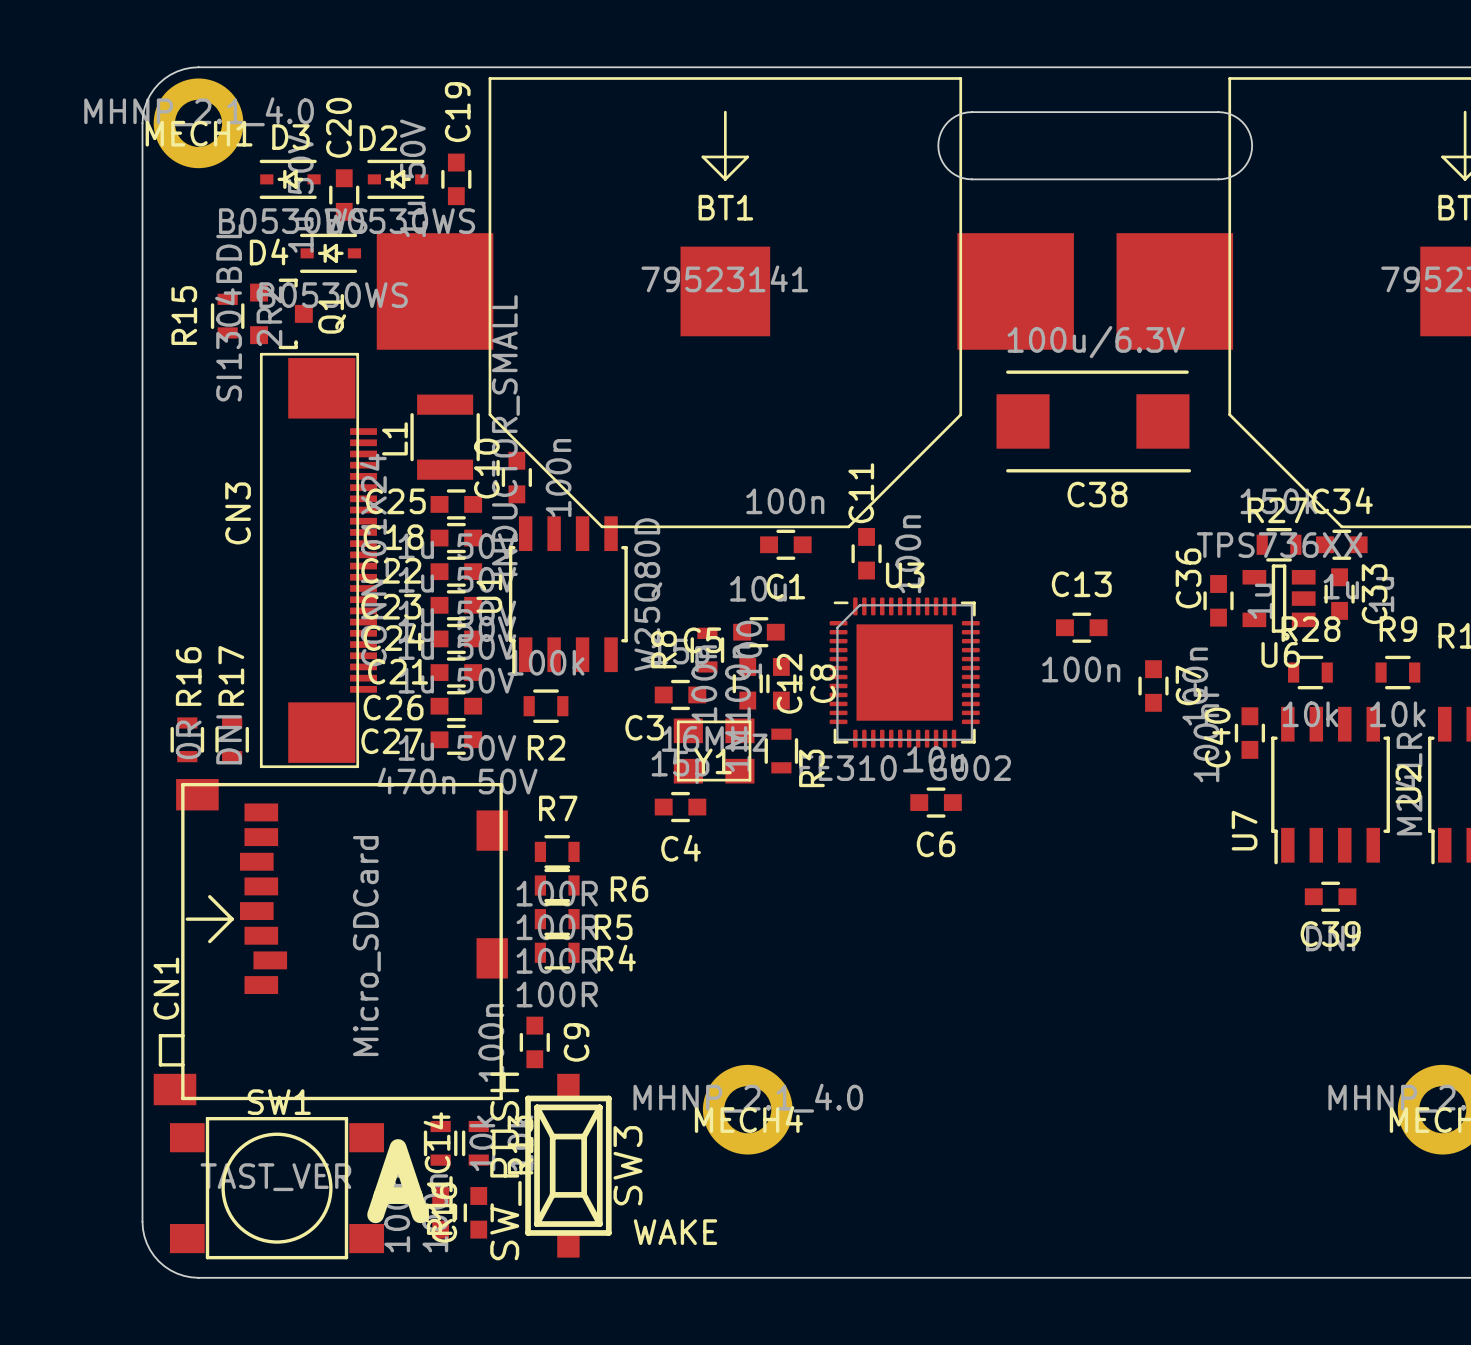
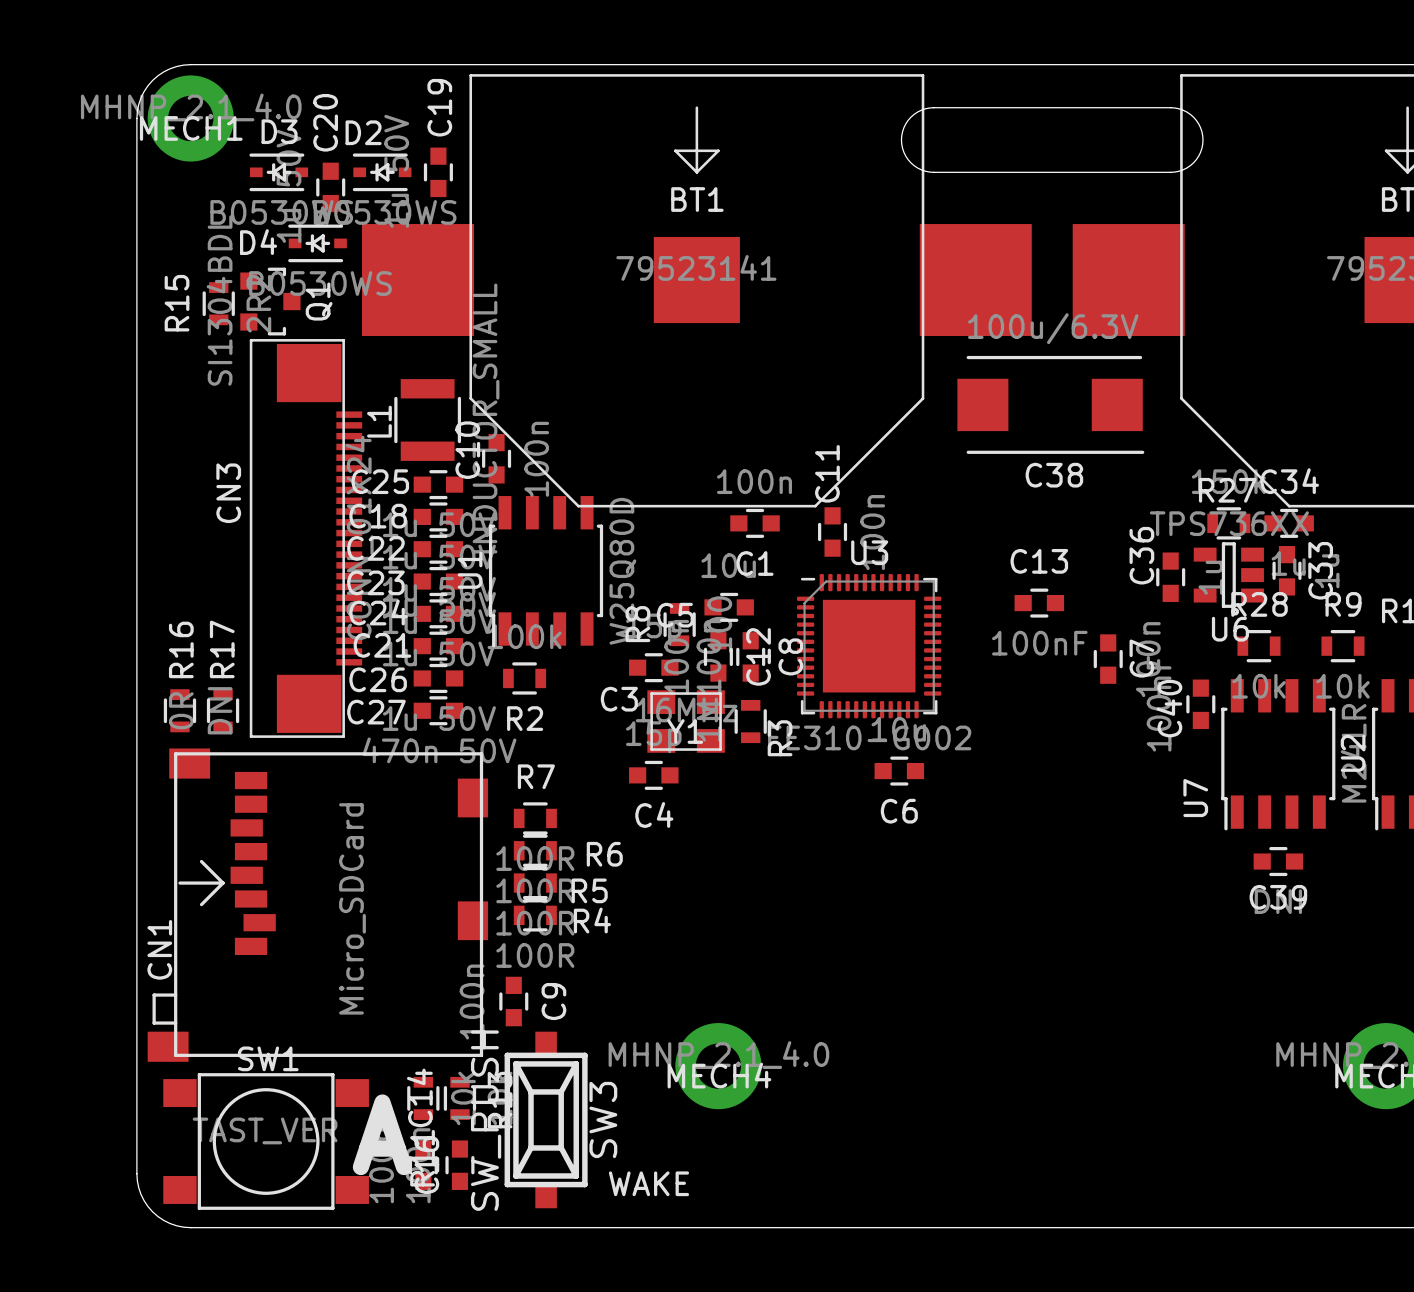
C13 value: 100n (1081, 669) -> 100nF (1039, 643)

